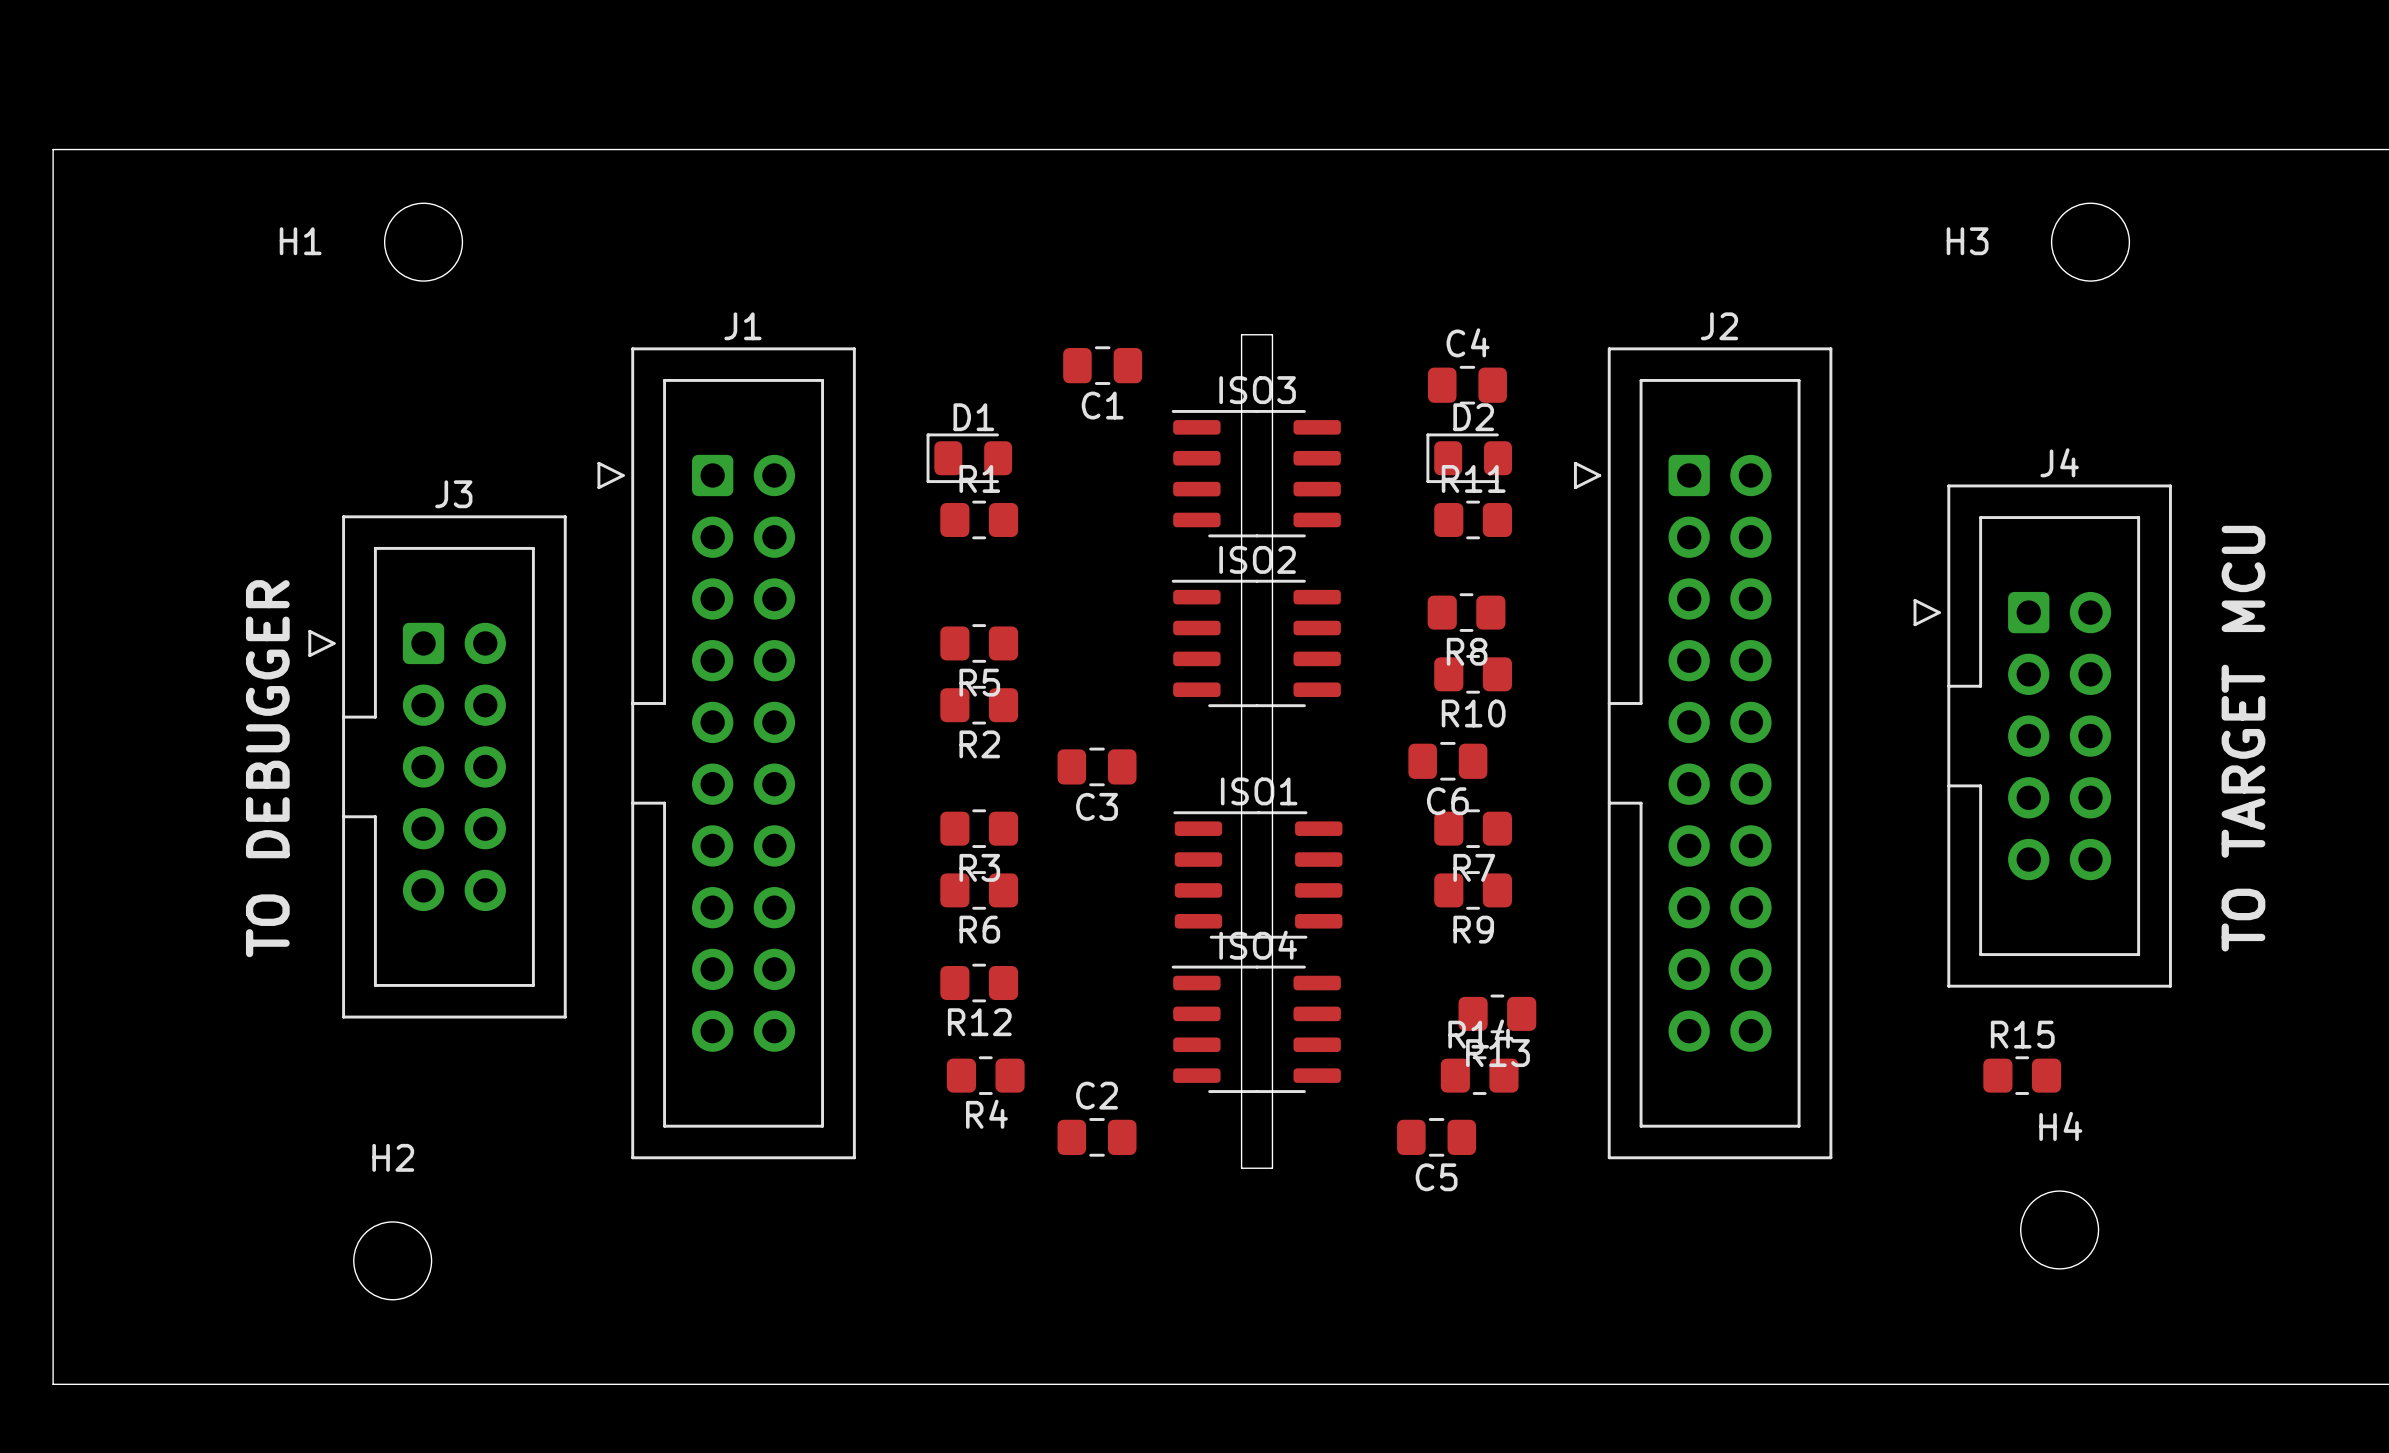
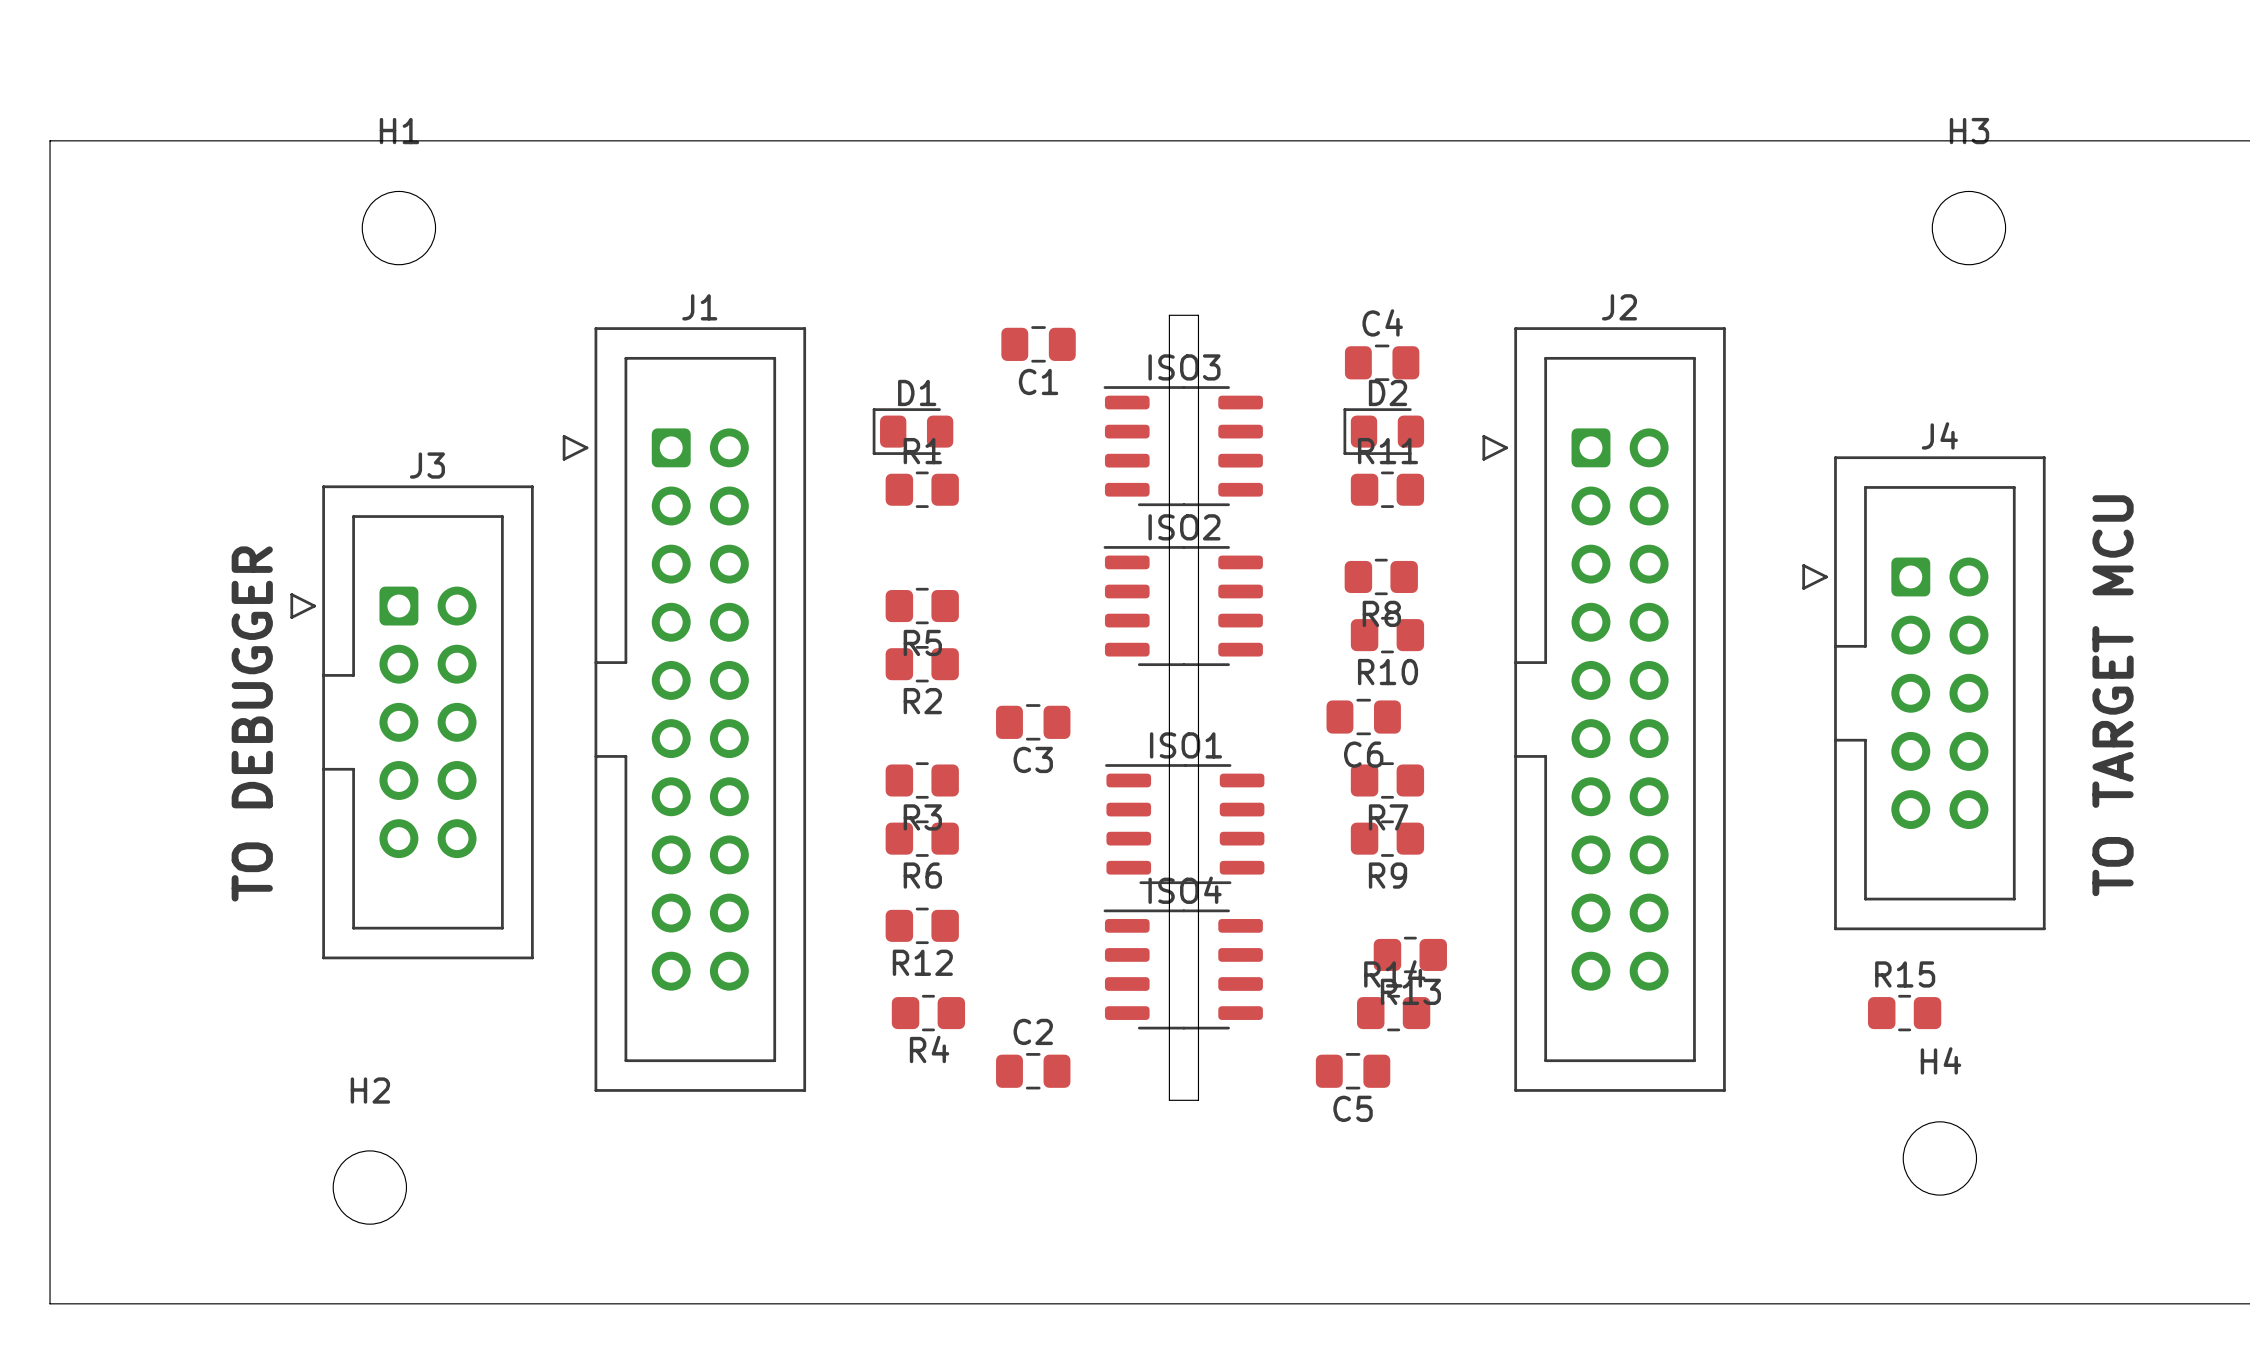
H1 name position: H1 (300, 241) -> H1 (399, 131)
H3 name position: H3 (1967, 241) -> H3 (1969, 131)

